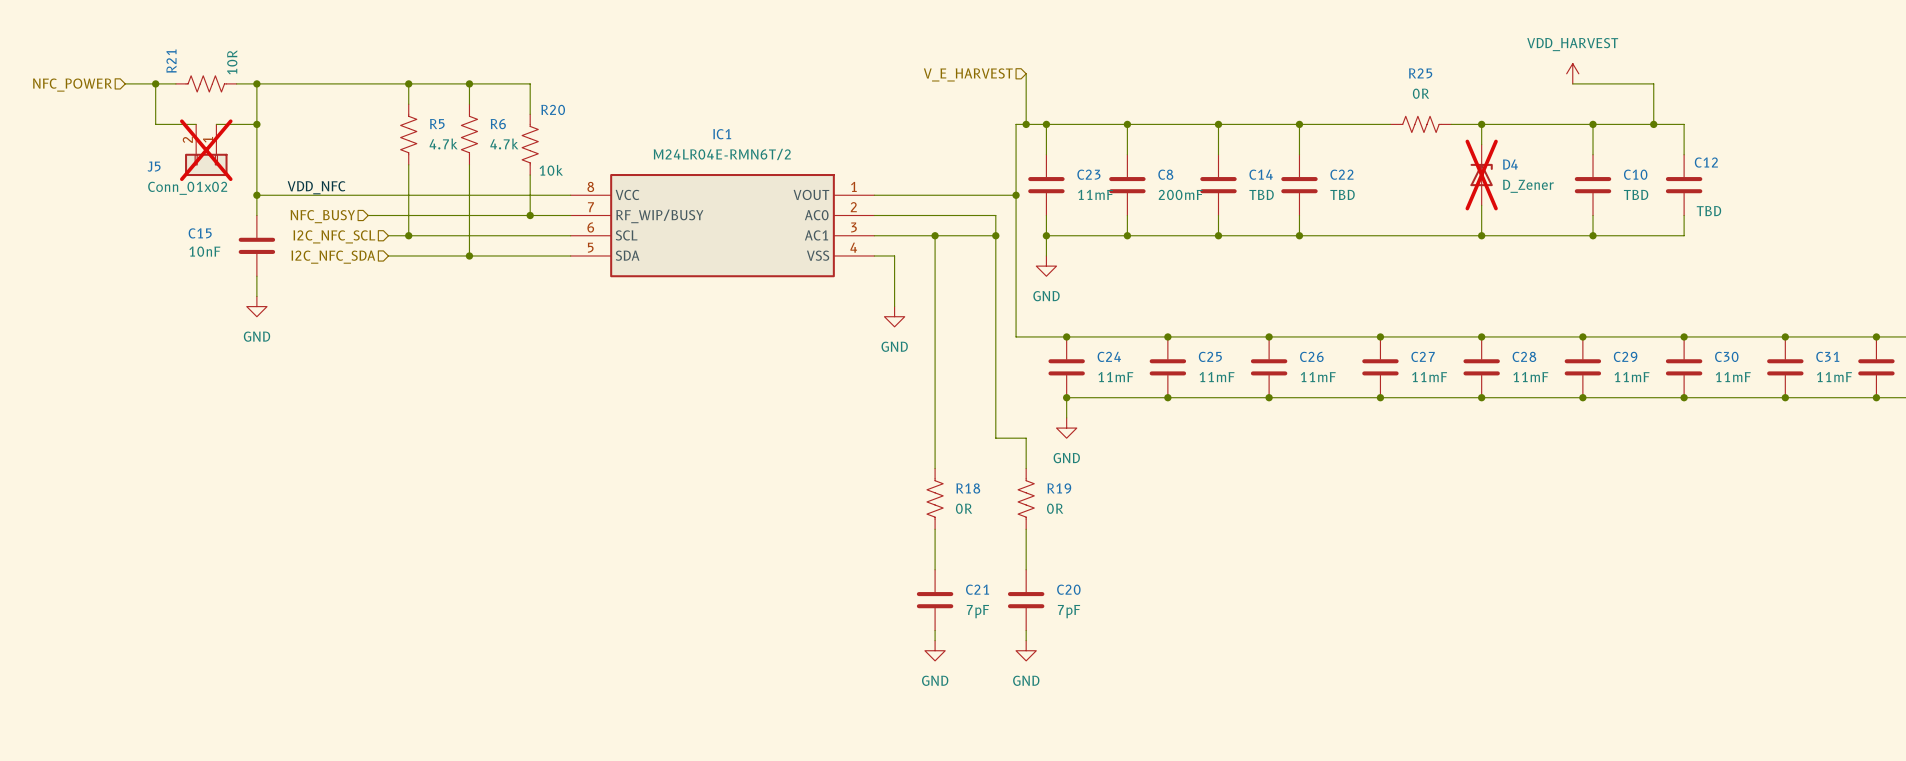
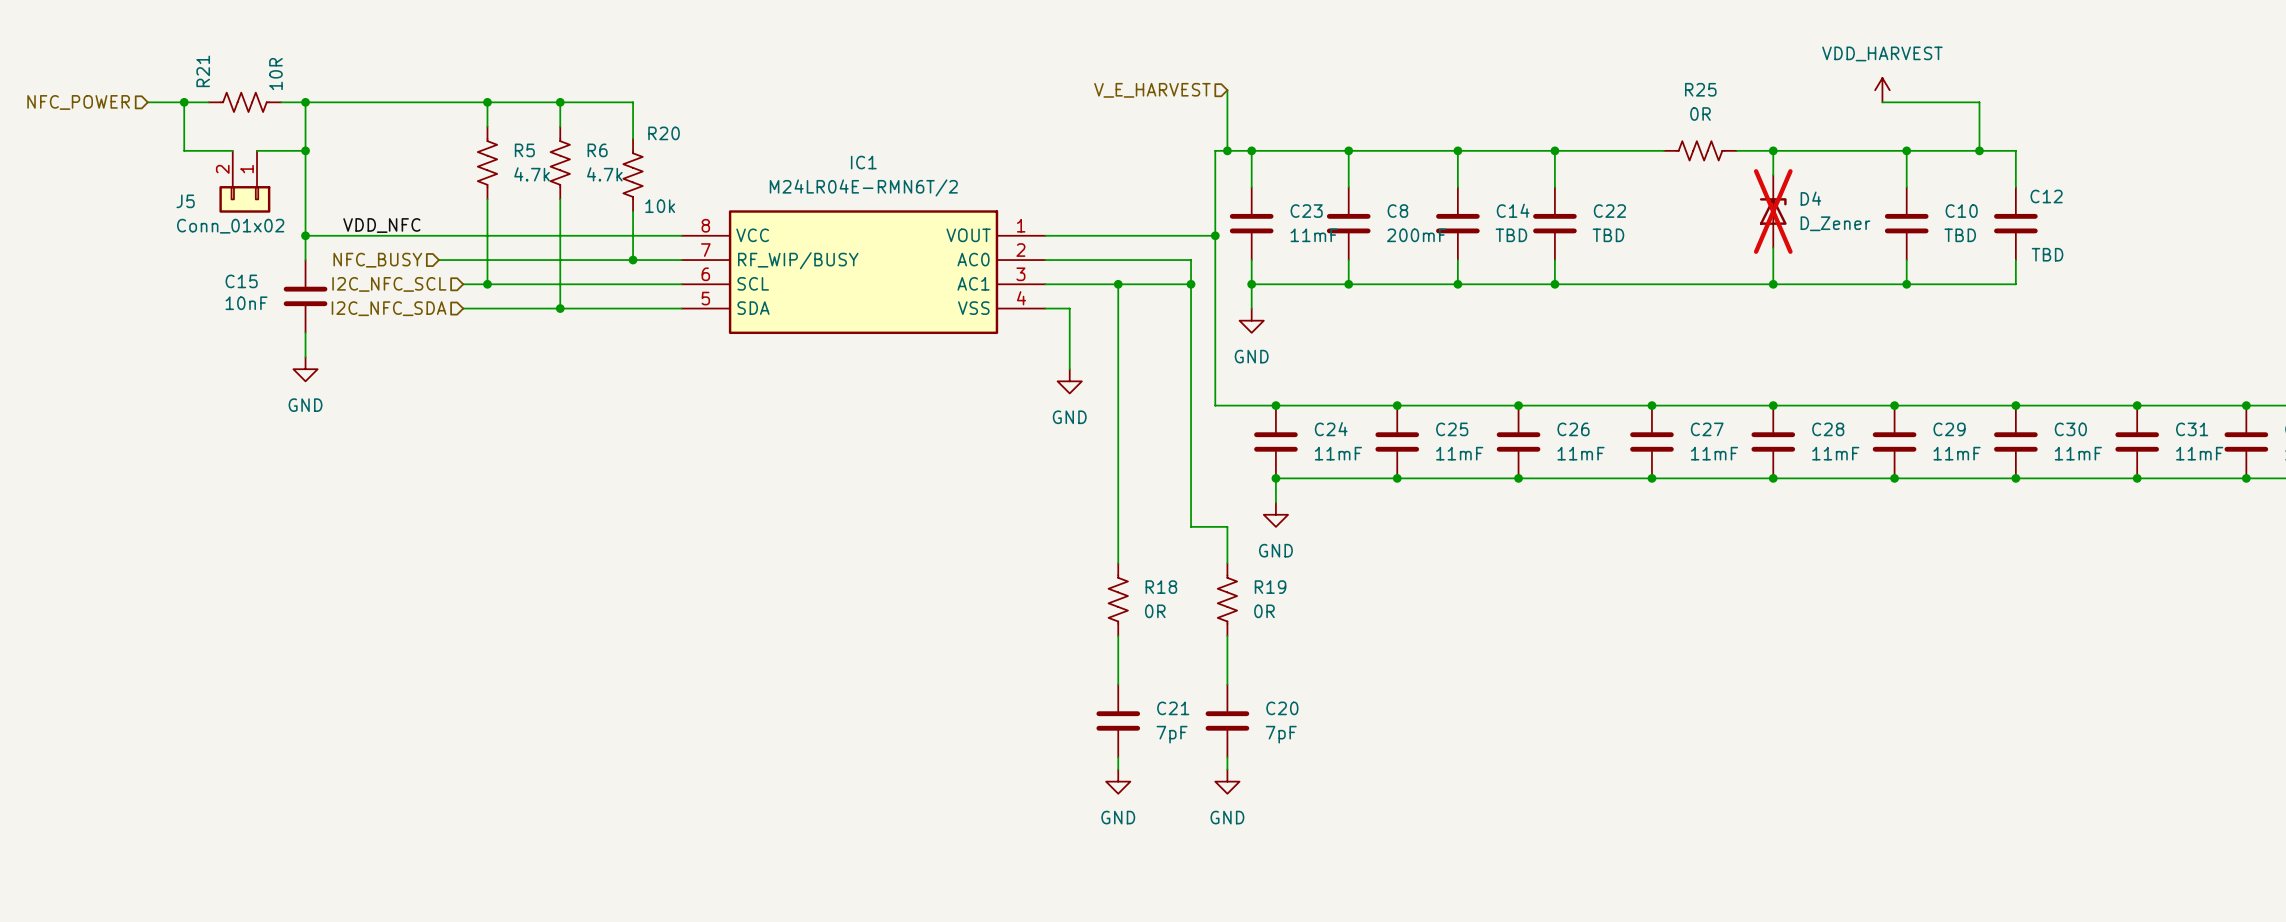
J5 do-not-place cross: (206, 150) -> none

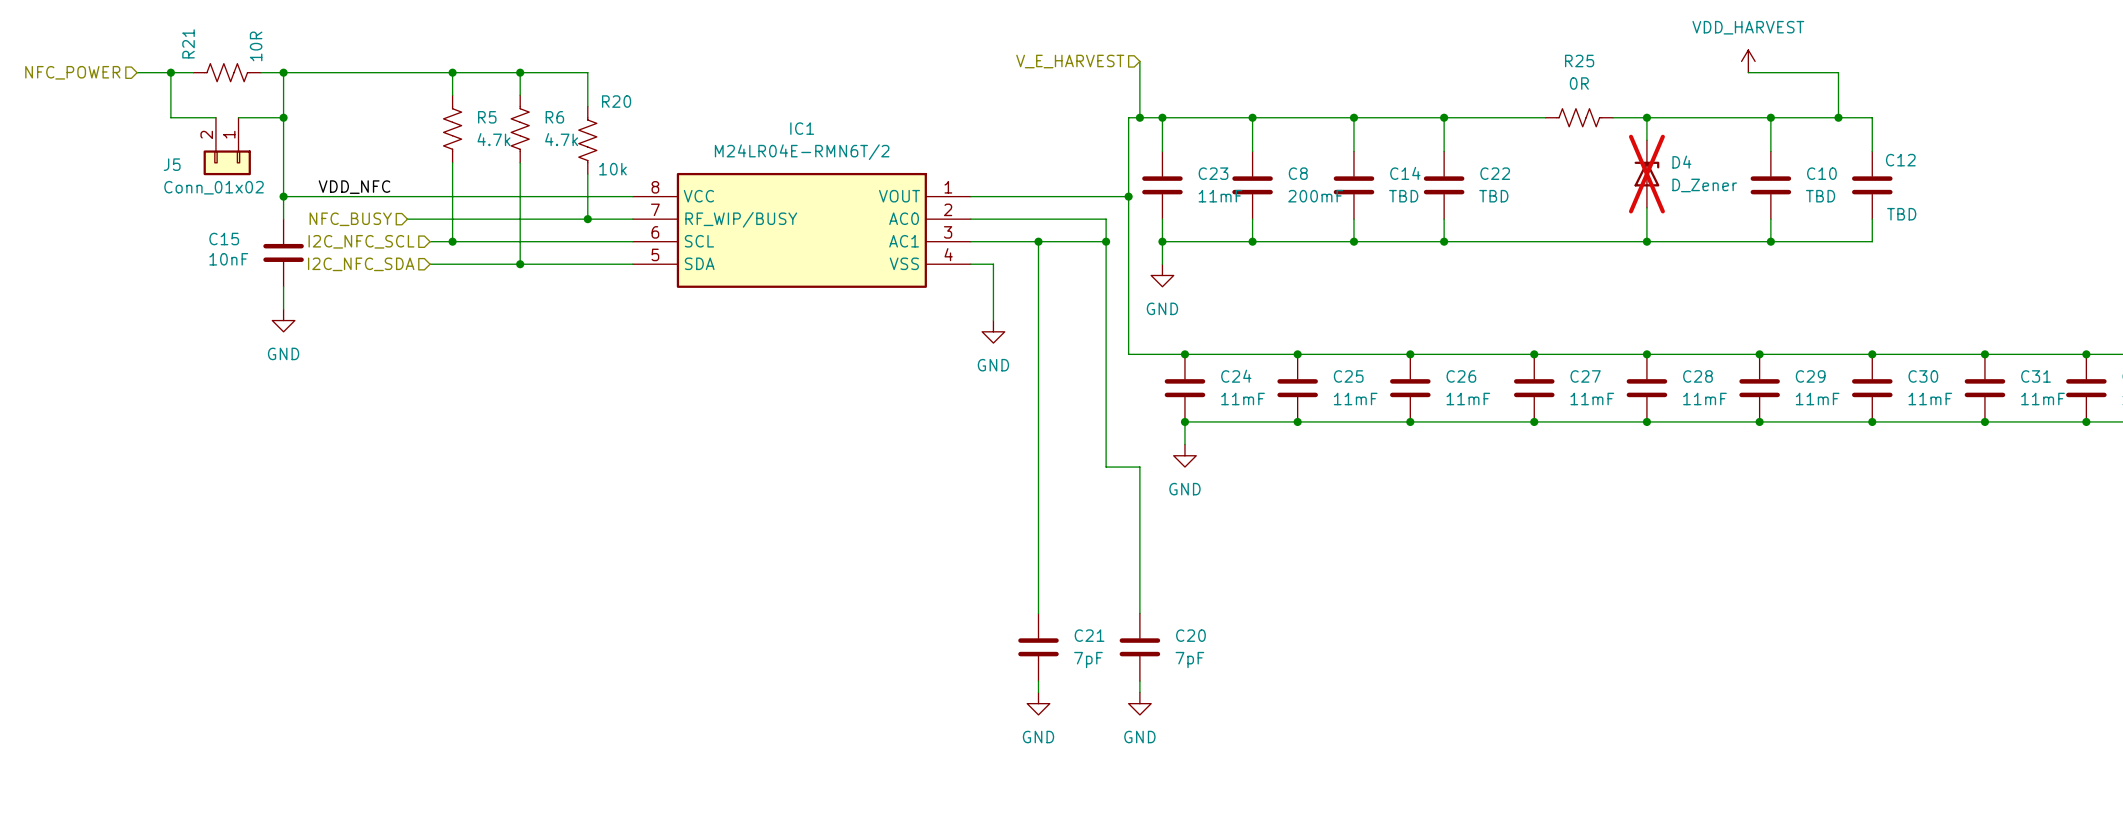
R18: 0R (1118, 599) -> none
R19: 0R (1227, 599) -> none

